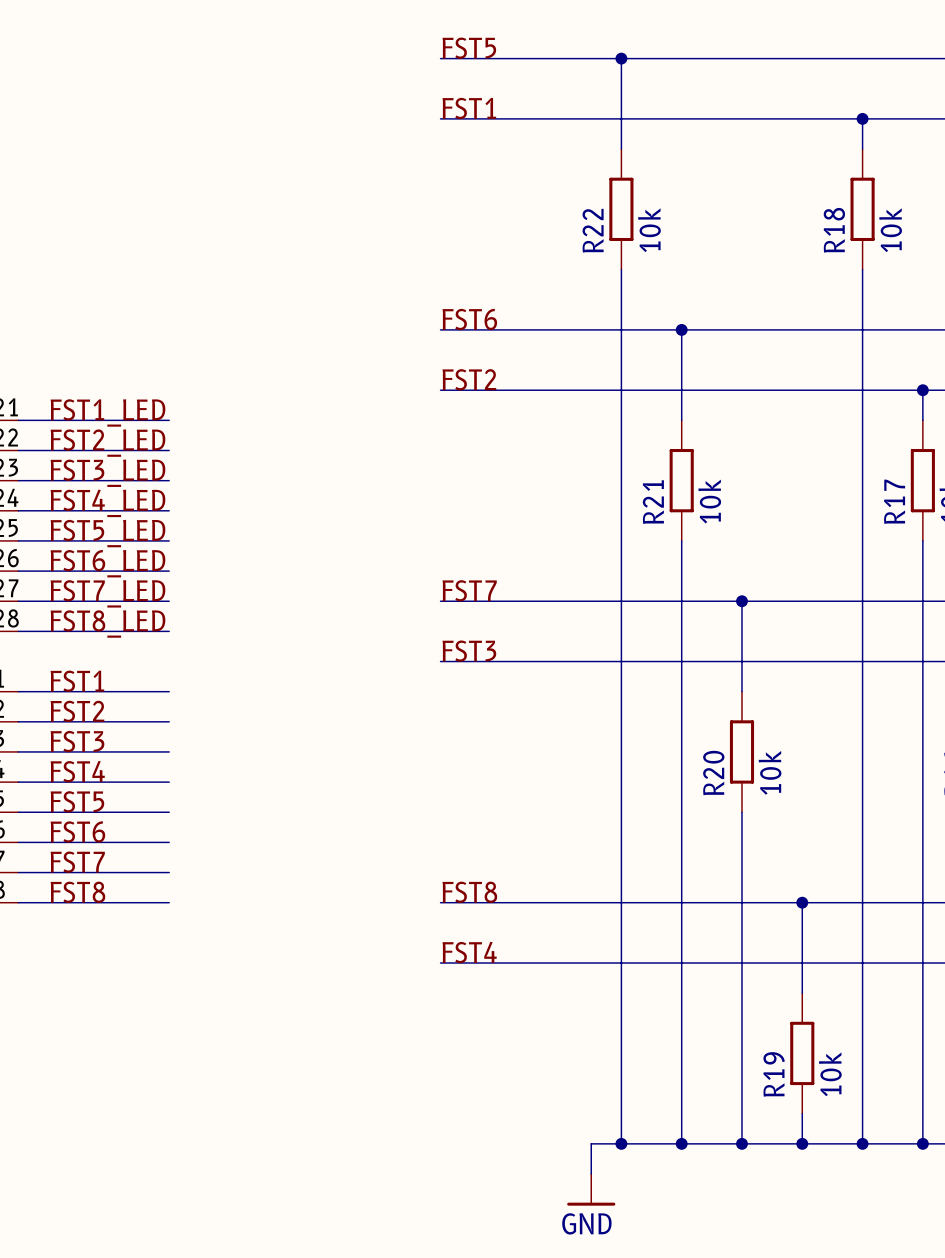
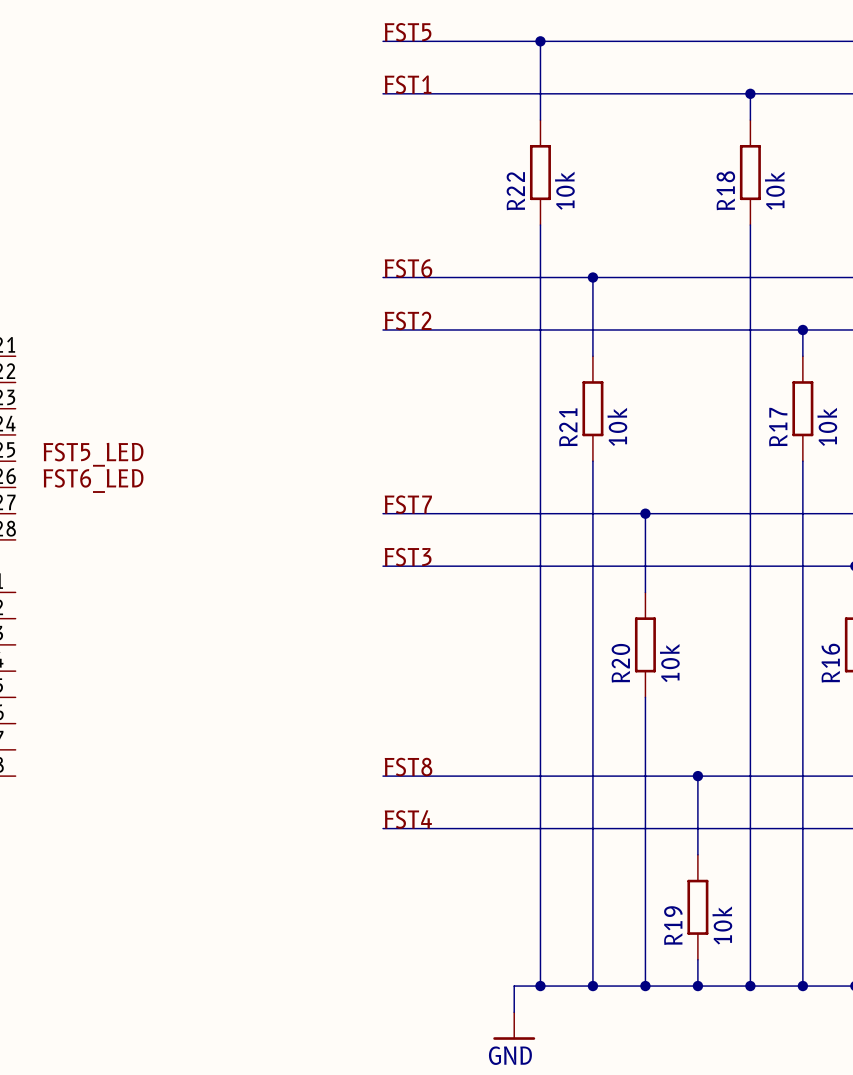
label: FST1_LED (107, 412) -> none
wire: (18, 420) (169, 420) -> none
label: FST2_LED (107, 443) -> none
wire: (18, 450) (169, 450) -> none
label: FST3_LED (107, 473) -> none
wire: (18, 480) (169, 480) -> none
label: FST4_LED (107, 503) -> none
wire: (18, 510) (169, 510) -> none
wire: (18, 540) (169, 540) -> none
wire: (18, 571) (169, 571) -> none
label: FST7_LED (107, 593) -> none
wire: (18, 601) (169, 601) -> none
label: FST8_LED (107, 623) -> none
wire: (18, 631) (169, 631) -> none
label: FST1 (77, 681) -> none
wire: (18, 691) (169, 691) -> none
label: FST2 (77, 711) -> none
wire: (18, 721) (169, 721) -> none
label: FST3 (77, 741) -> none
wire: (18, 751) (169, 751) -> none
label: FST4 (77, 771) -> none
wire: (18, 782) (169, 782) -> none
label: FST5 (77, 801) -> none
wire: (18, 812) (169, 812) -> none
label: FST6 (77, 831) -> none
wire: (18, 842) (169, 842) -> none
label: FST7 (77, 862) -> none
wire: (18, 872) (169, 872) -> none
label: FST8 (77, 892) -> none
wire: (18, 902) (169, 902) -> none

